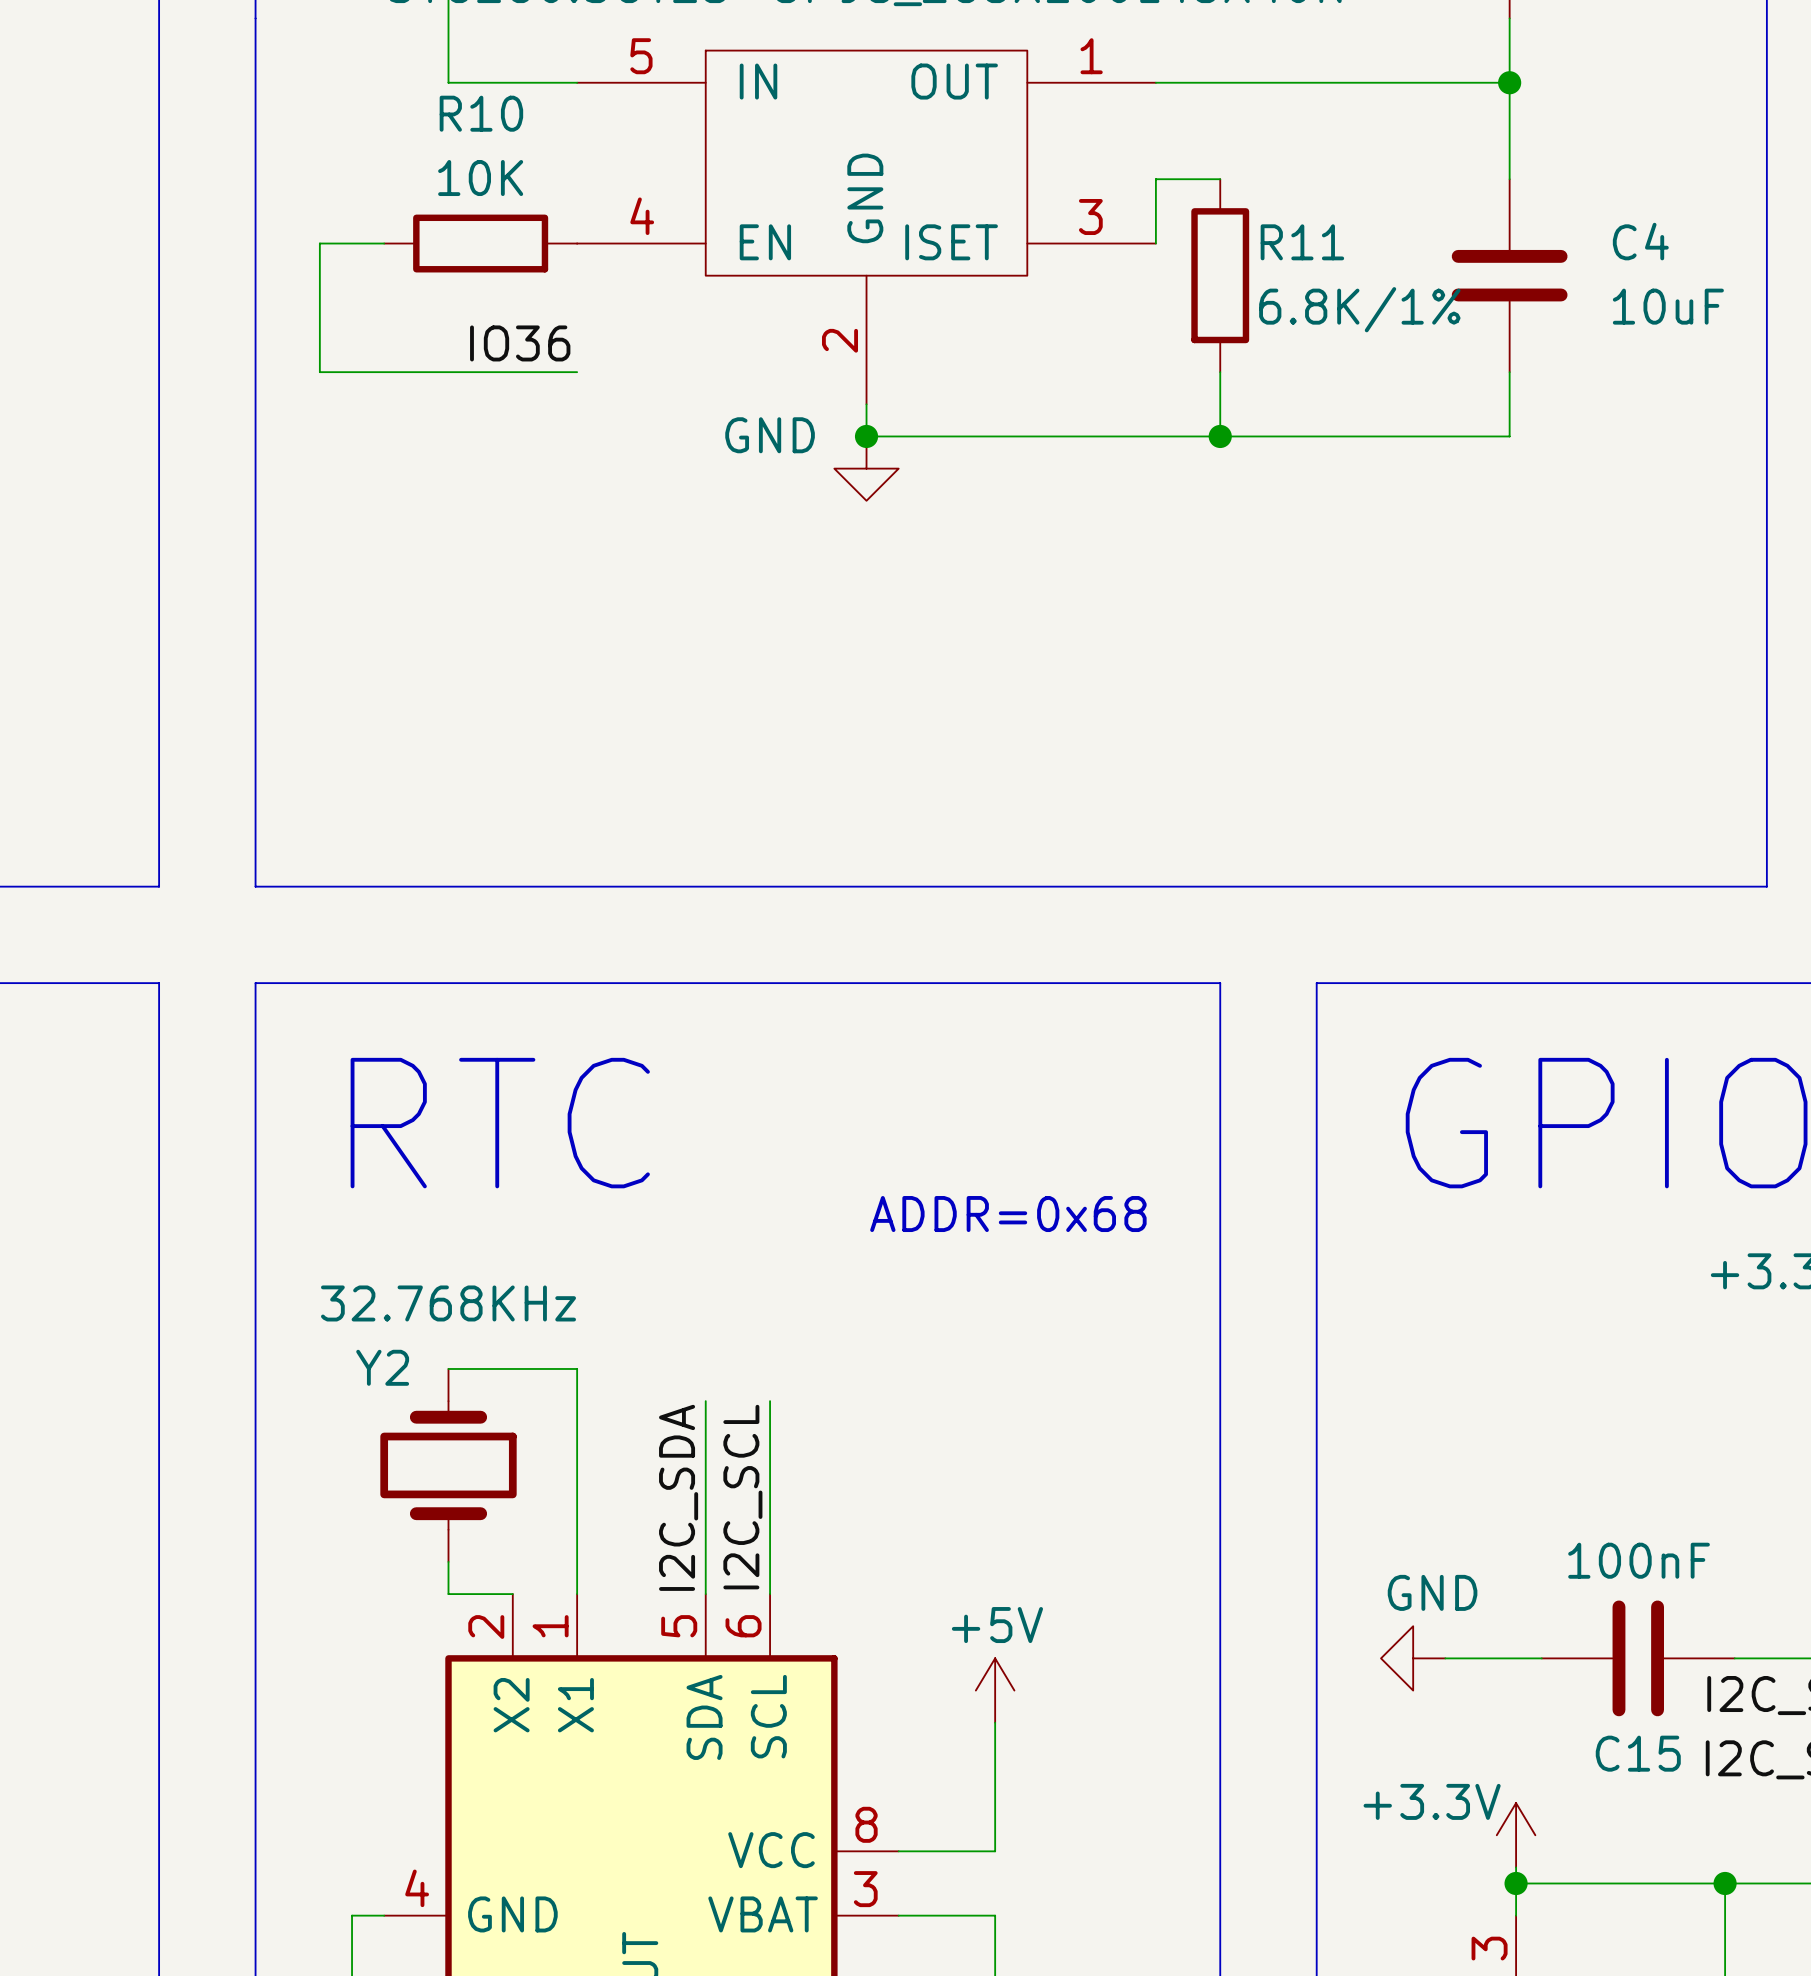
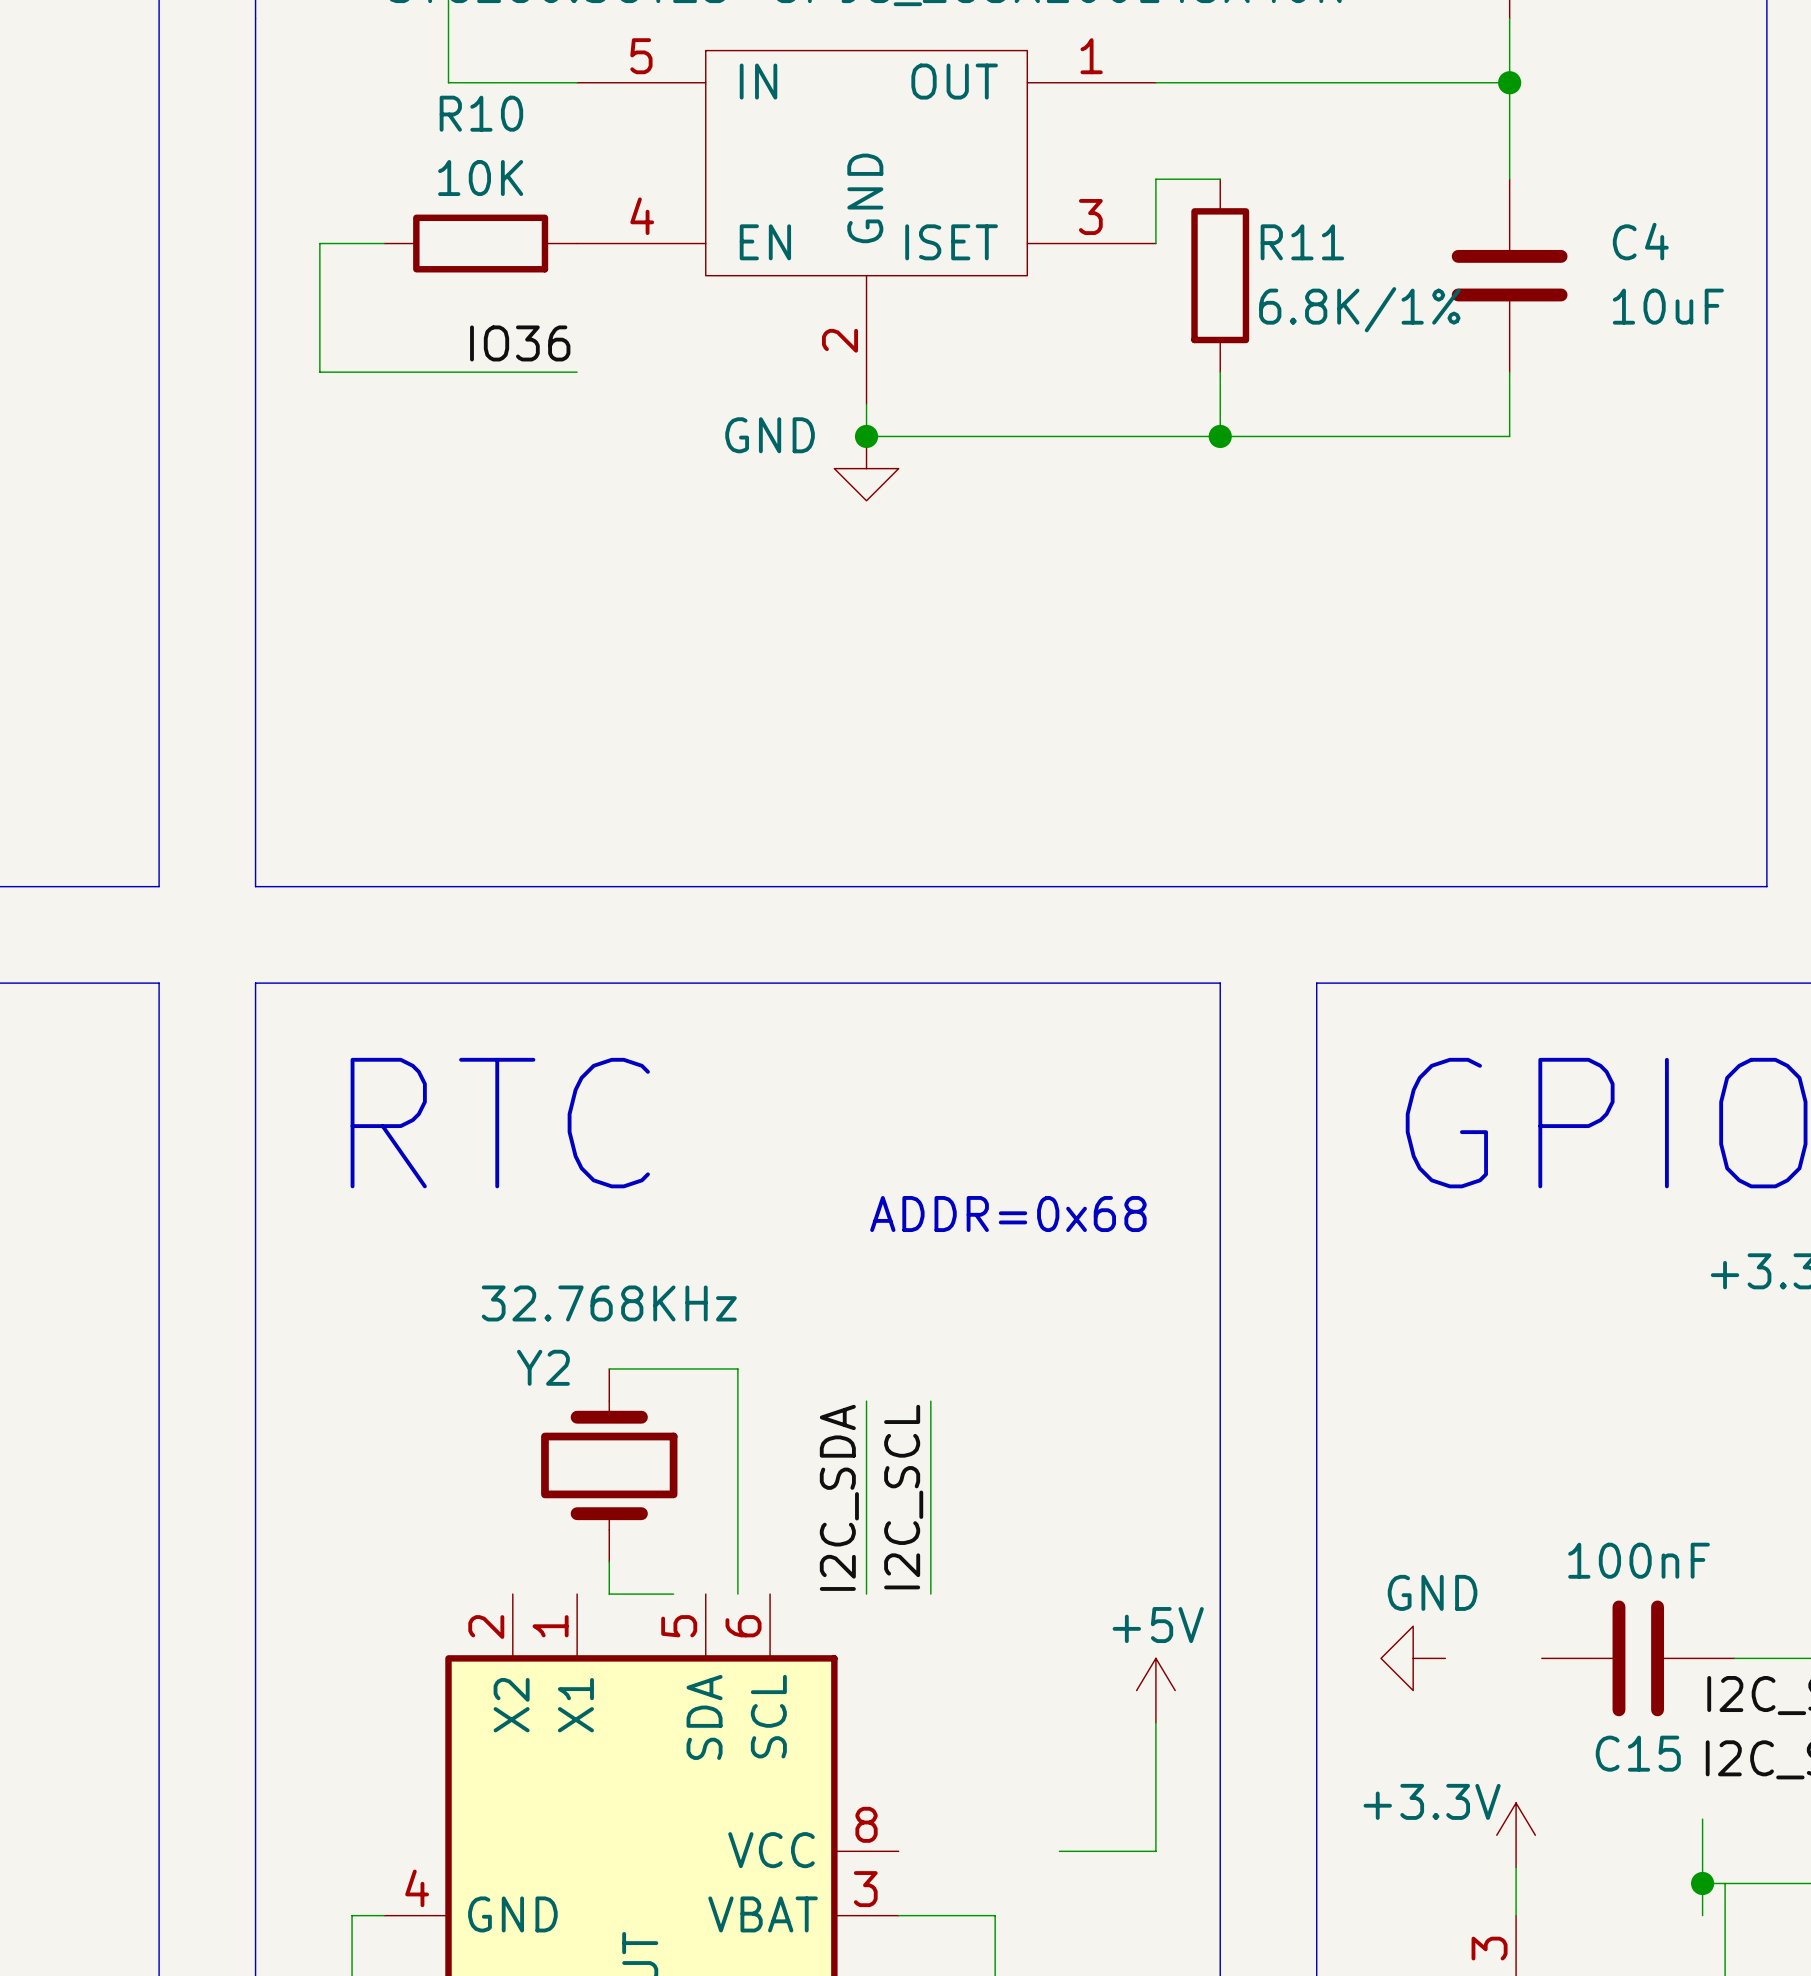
wire: (448, 1368) (577, 1368) (577, 1594) -> (609, 1368) (737, 1368) (737, 1594)
wire: (705, 1401) (705, 1594) -> (866, 1401) (866, 1594)
wire: (770, 1401) (770, 1594) -> (930, 1401) (930, 1594)
Y2 position: (448, 1465) -> (609, 1465)
label position: I2C_SDA (678, 1497) -> I2C_SDA (839, 1497)
label position: I2C_SCL (742, 1497) -> I2C_SCL (903, 1497)
wire: (448, 1561) (448, 1594) (512, 1594) -> (609, 1561) (609, 1594) (673, 1594)
wire: (1445, 1658) (1541, 1658) -> none
power symbol position: +5V (995, 1690) -> +5V (1155, 1690)
wire: (995, 1722) (995, 1851) (898, 1851) -> (1155, 1722) (1155, 1851) (1059, 1851)
wire: none -> (1702, 1819) (1702, 1915)
wire: (1516, 1883) (1702, 1883) -> none
junction: (1516, 1883) -> none
junction position: (1725, 1883) -> (1702, 1883)

